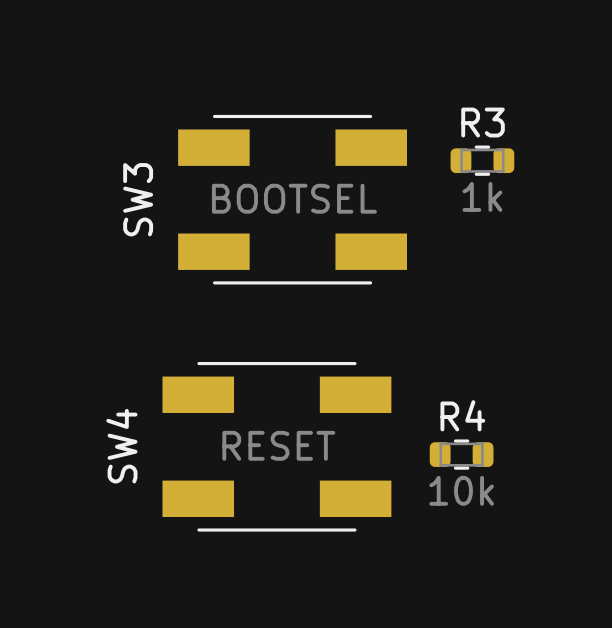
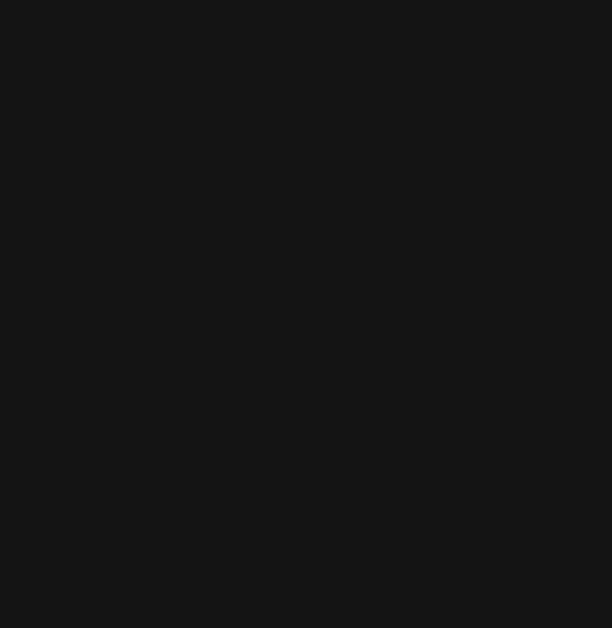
R3: 1k (482, 160) -> none
SW3: BOOTSEL (292, 199) -> none
SW4: RESET (276, 446) -> none
R4: 10k (461, 454) -> none

